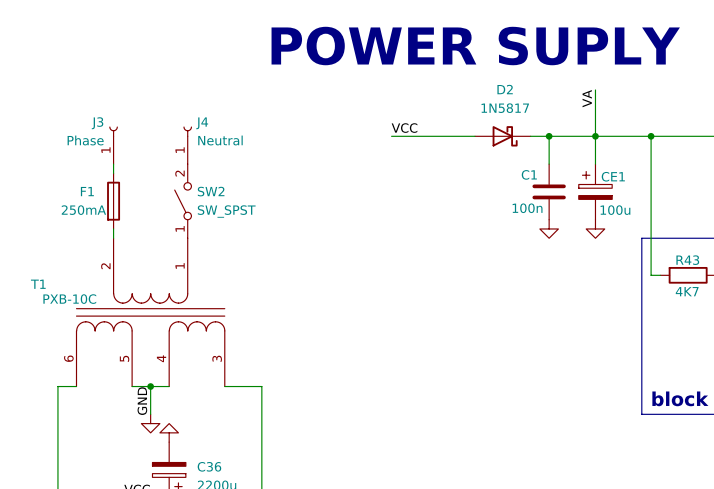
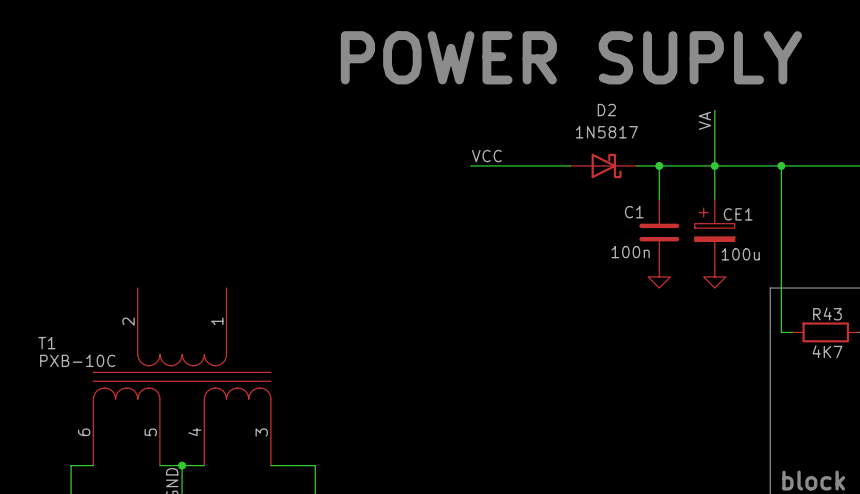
J3: Phase (113, 145) -> none
J4: Neutral (187, 145) -> none
wire: (113, 164) (113, 173) -> none
F1: 250mA (113, 201) -> none
SW2: SW_SPST (183, 201) -> none
wire: (113, 228) (113, 238) -> none

